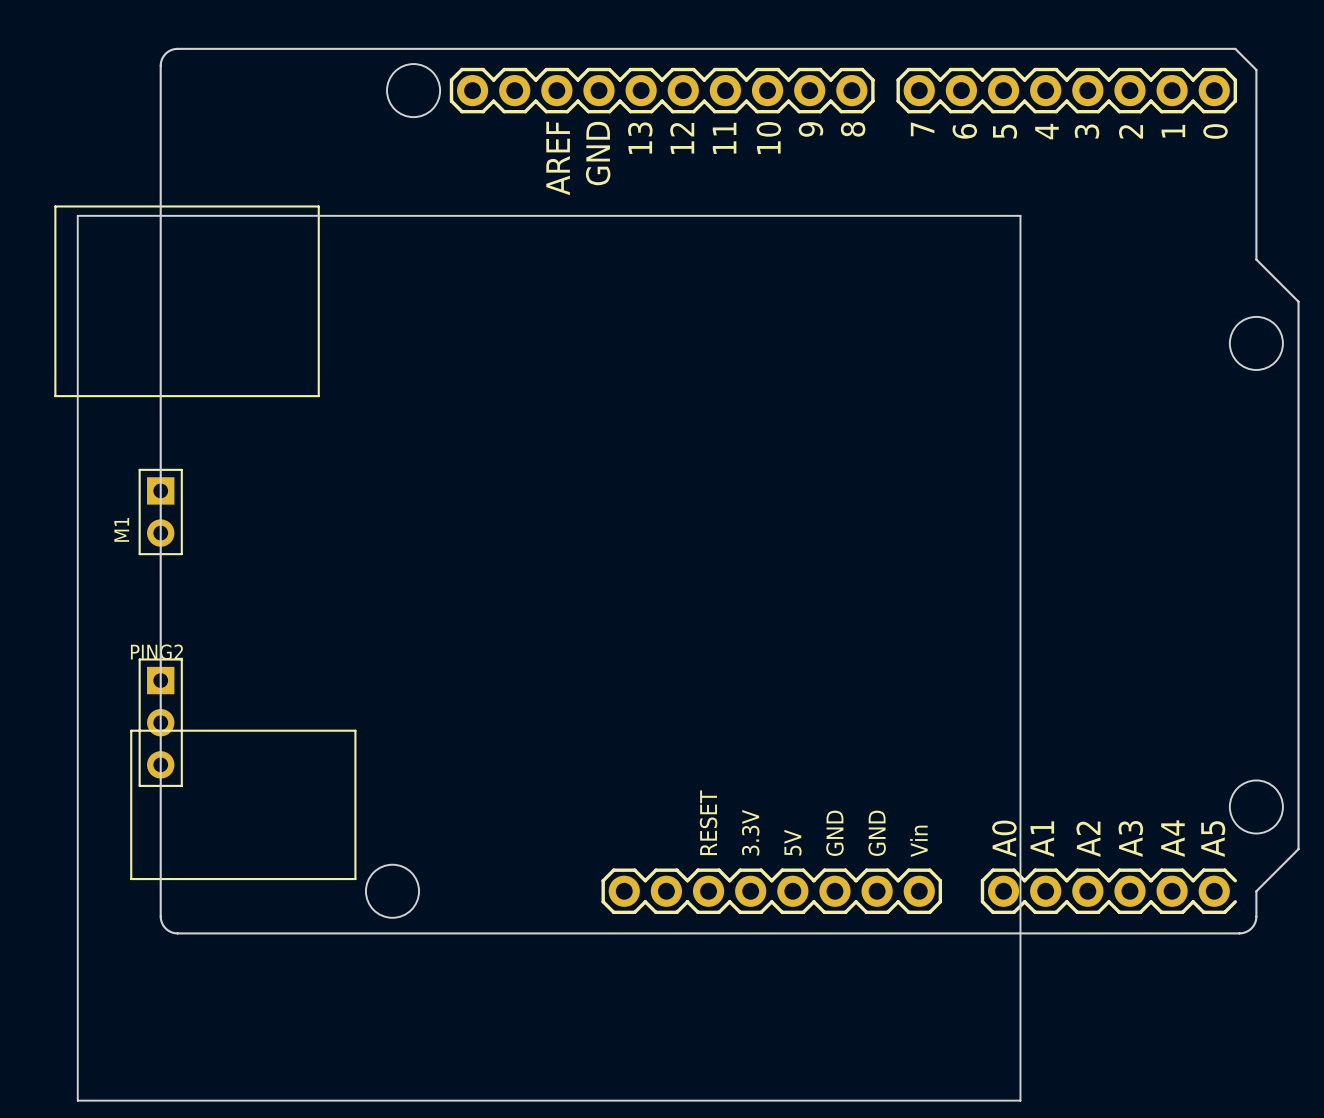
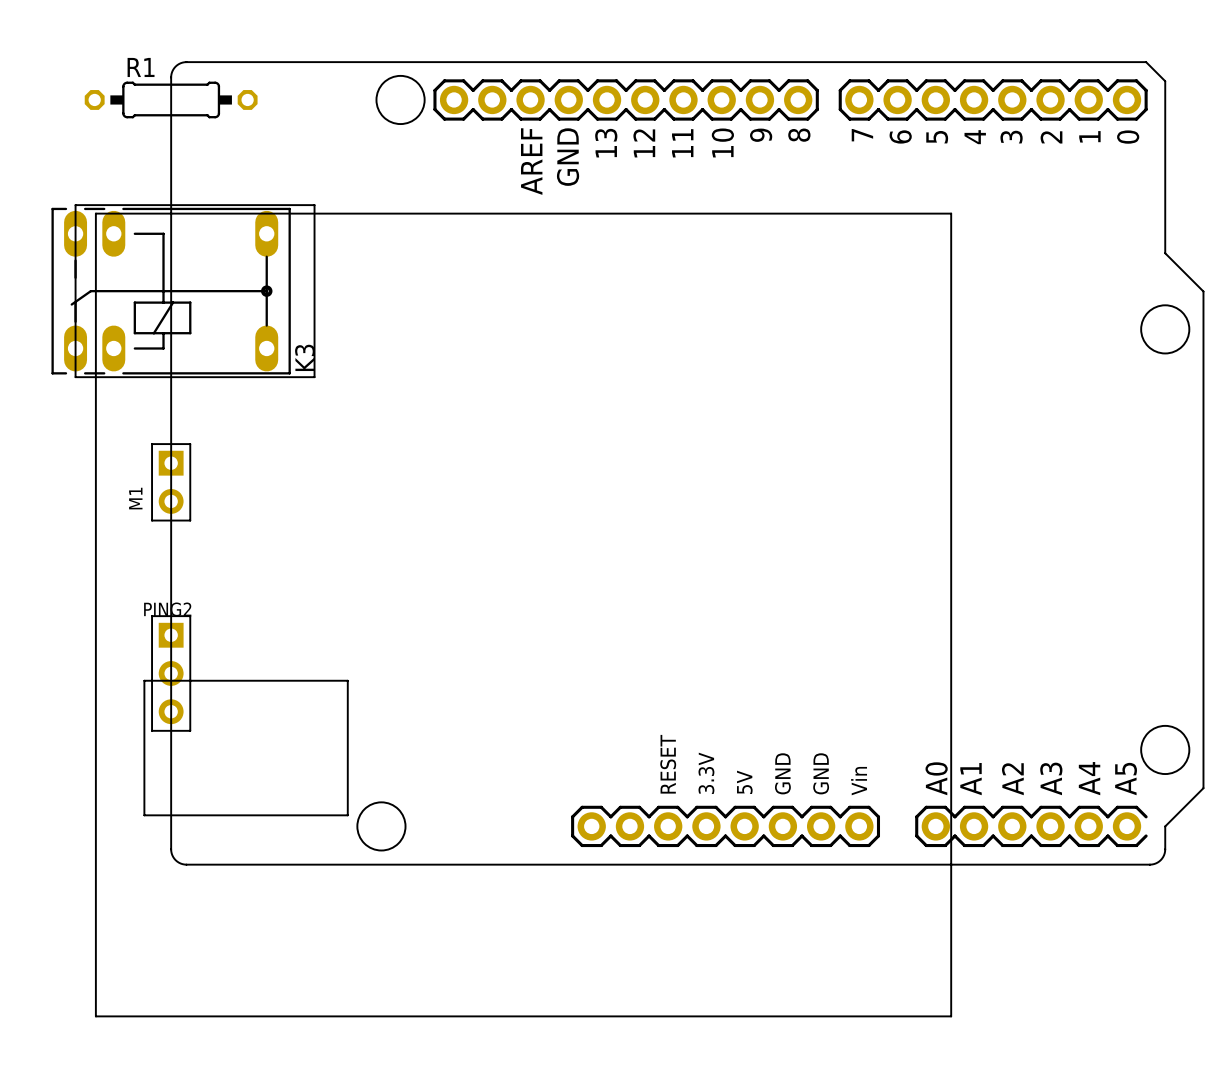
R1: none -> (171, 99)
K3: none -> (171, 291)

